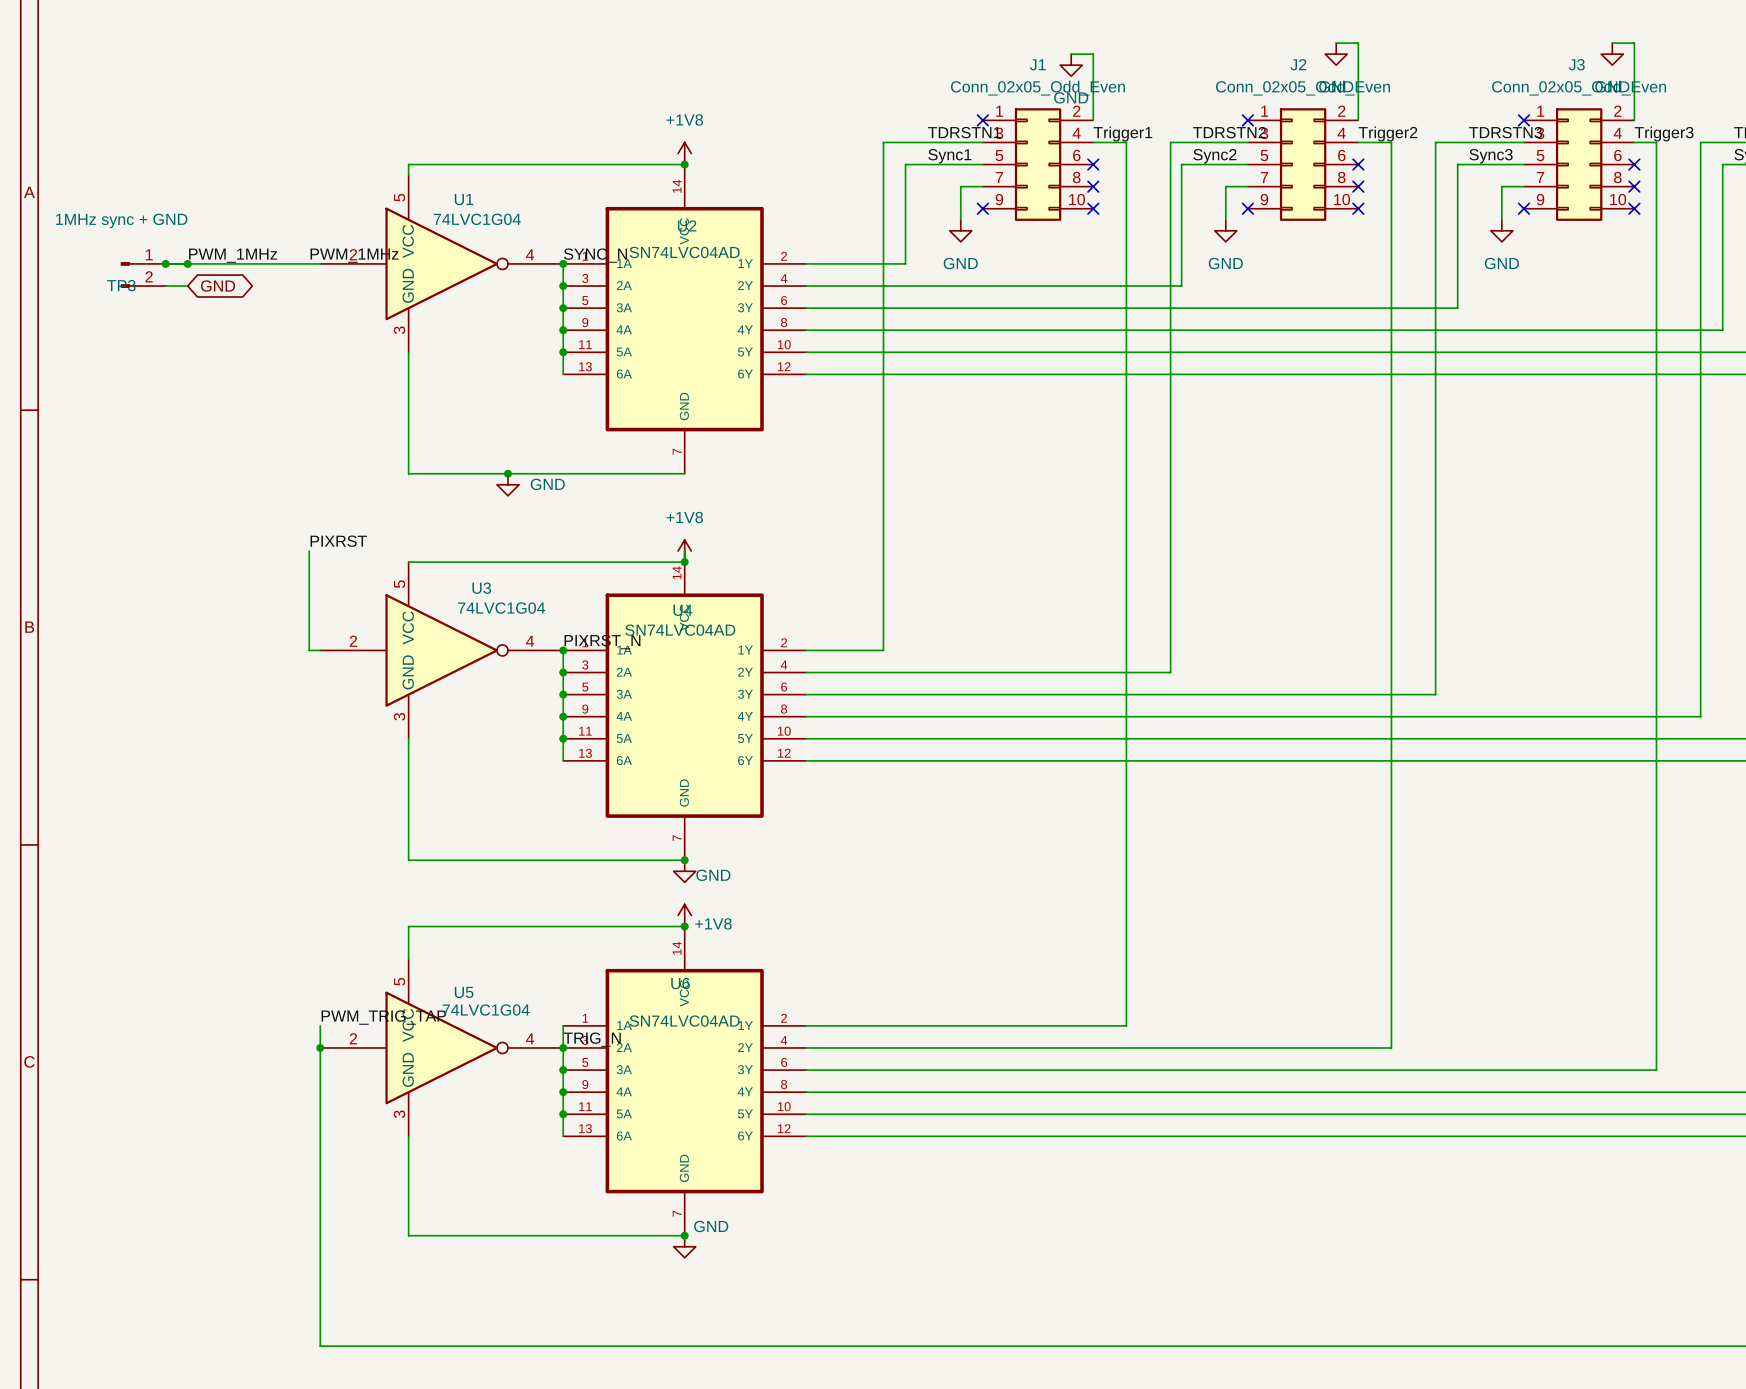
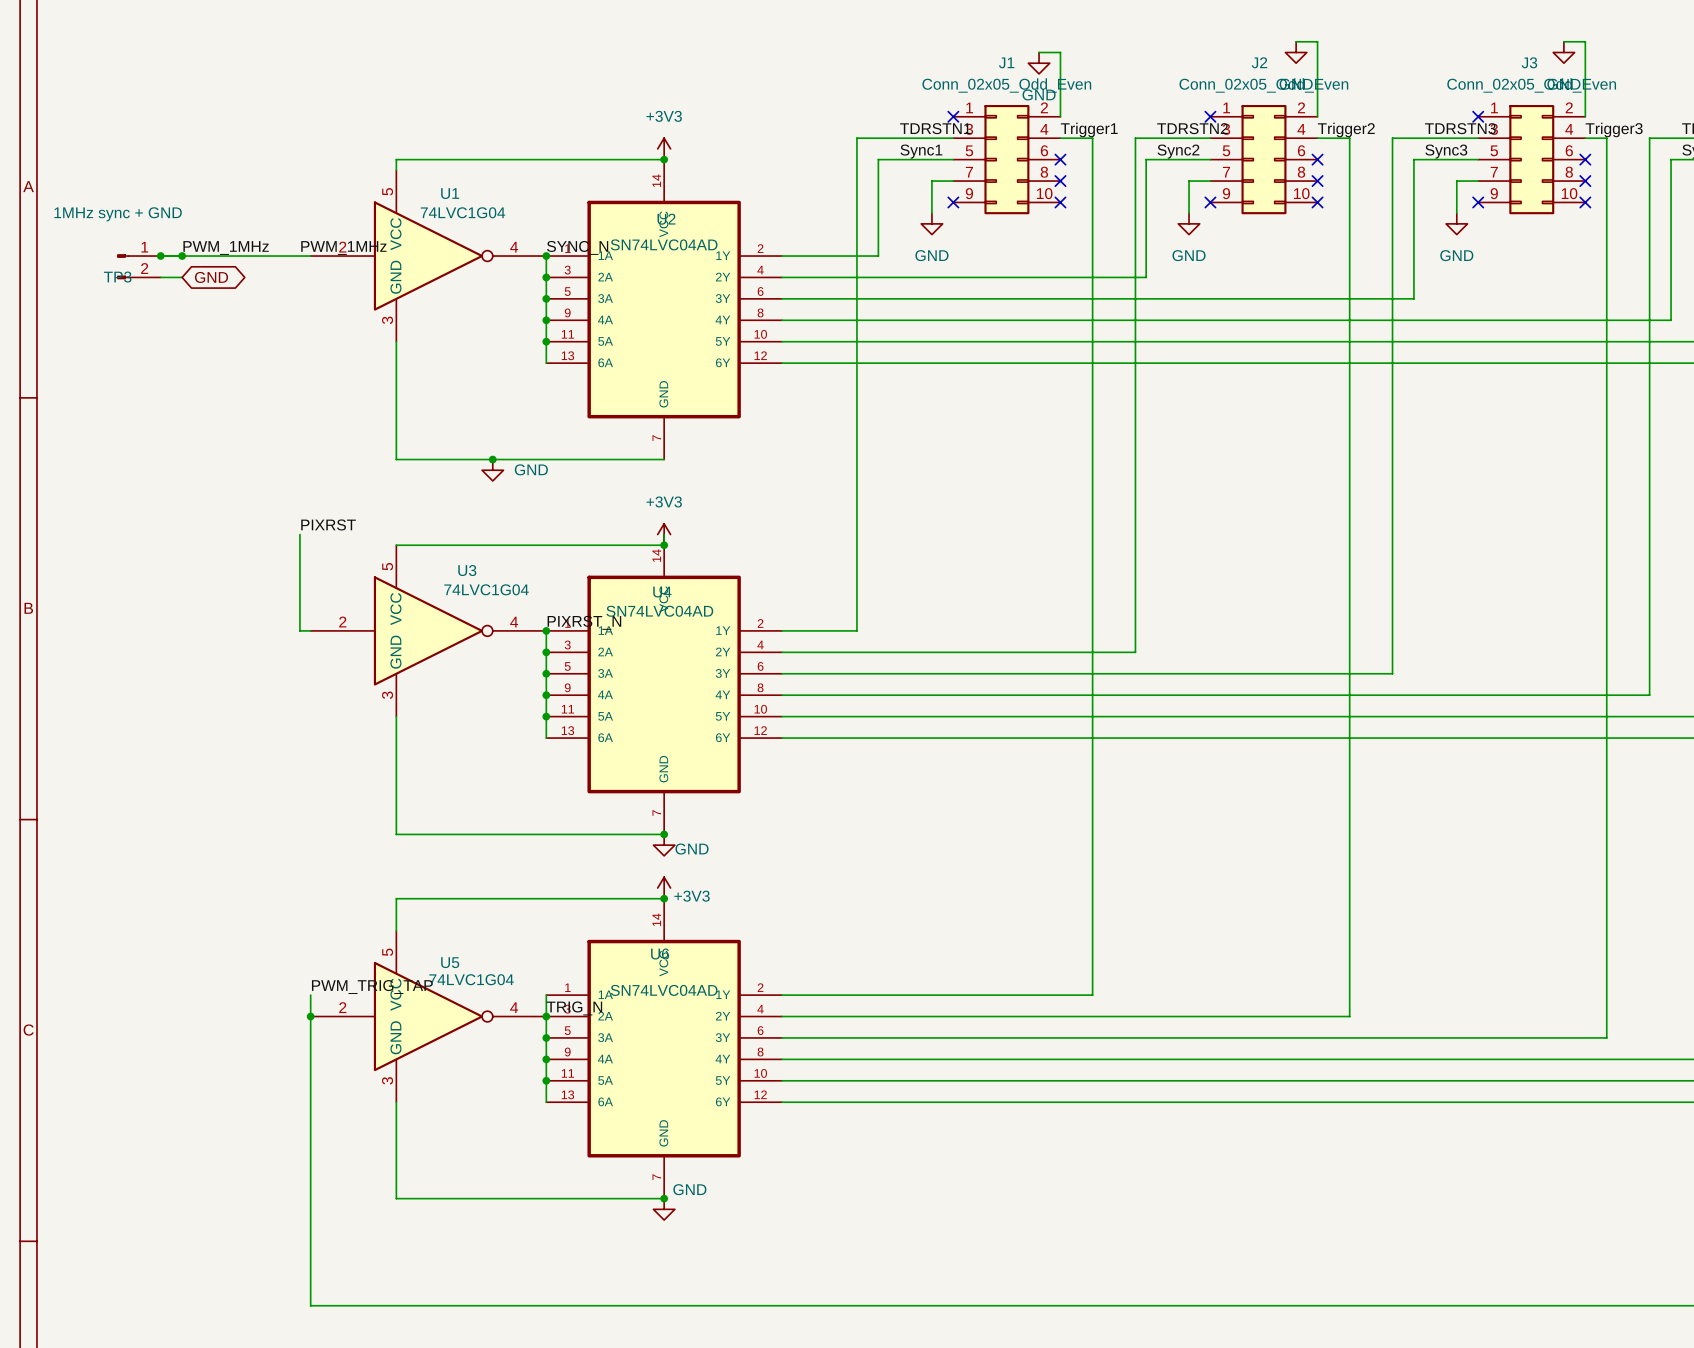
power symbol: +1V8 (684, 153) -> +3V3 (664, 148)
power symbol: +1V8 (684, 551) -> +3V3 (664, 534)
power symbol: +1V8 (684, 915) -> +3V3 (664, 887)

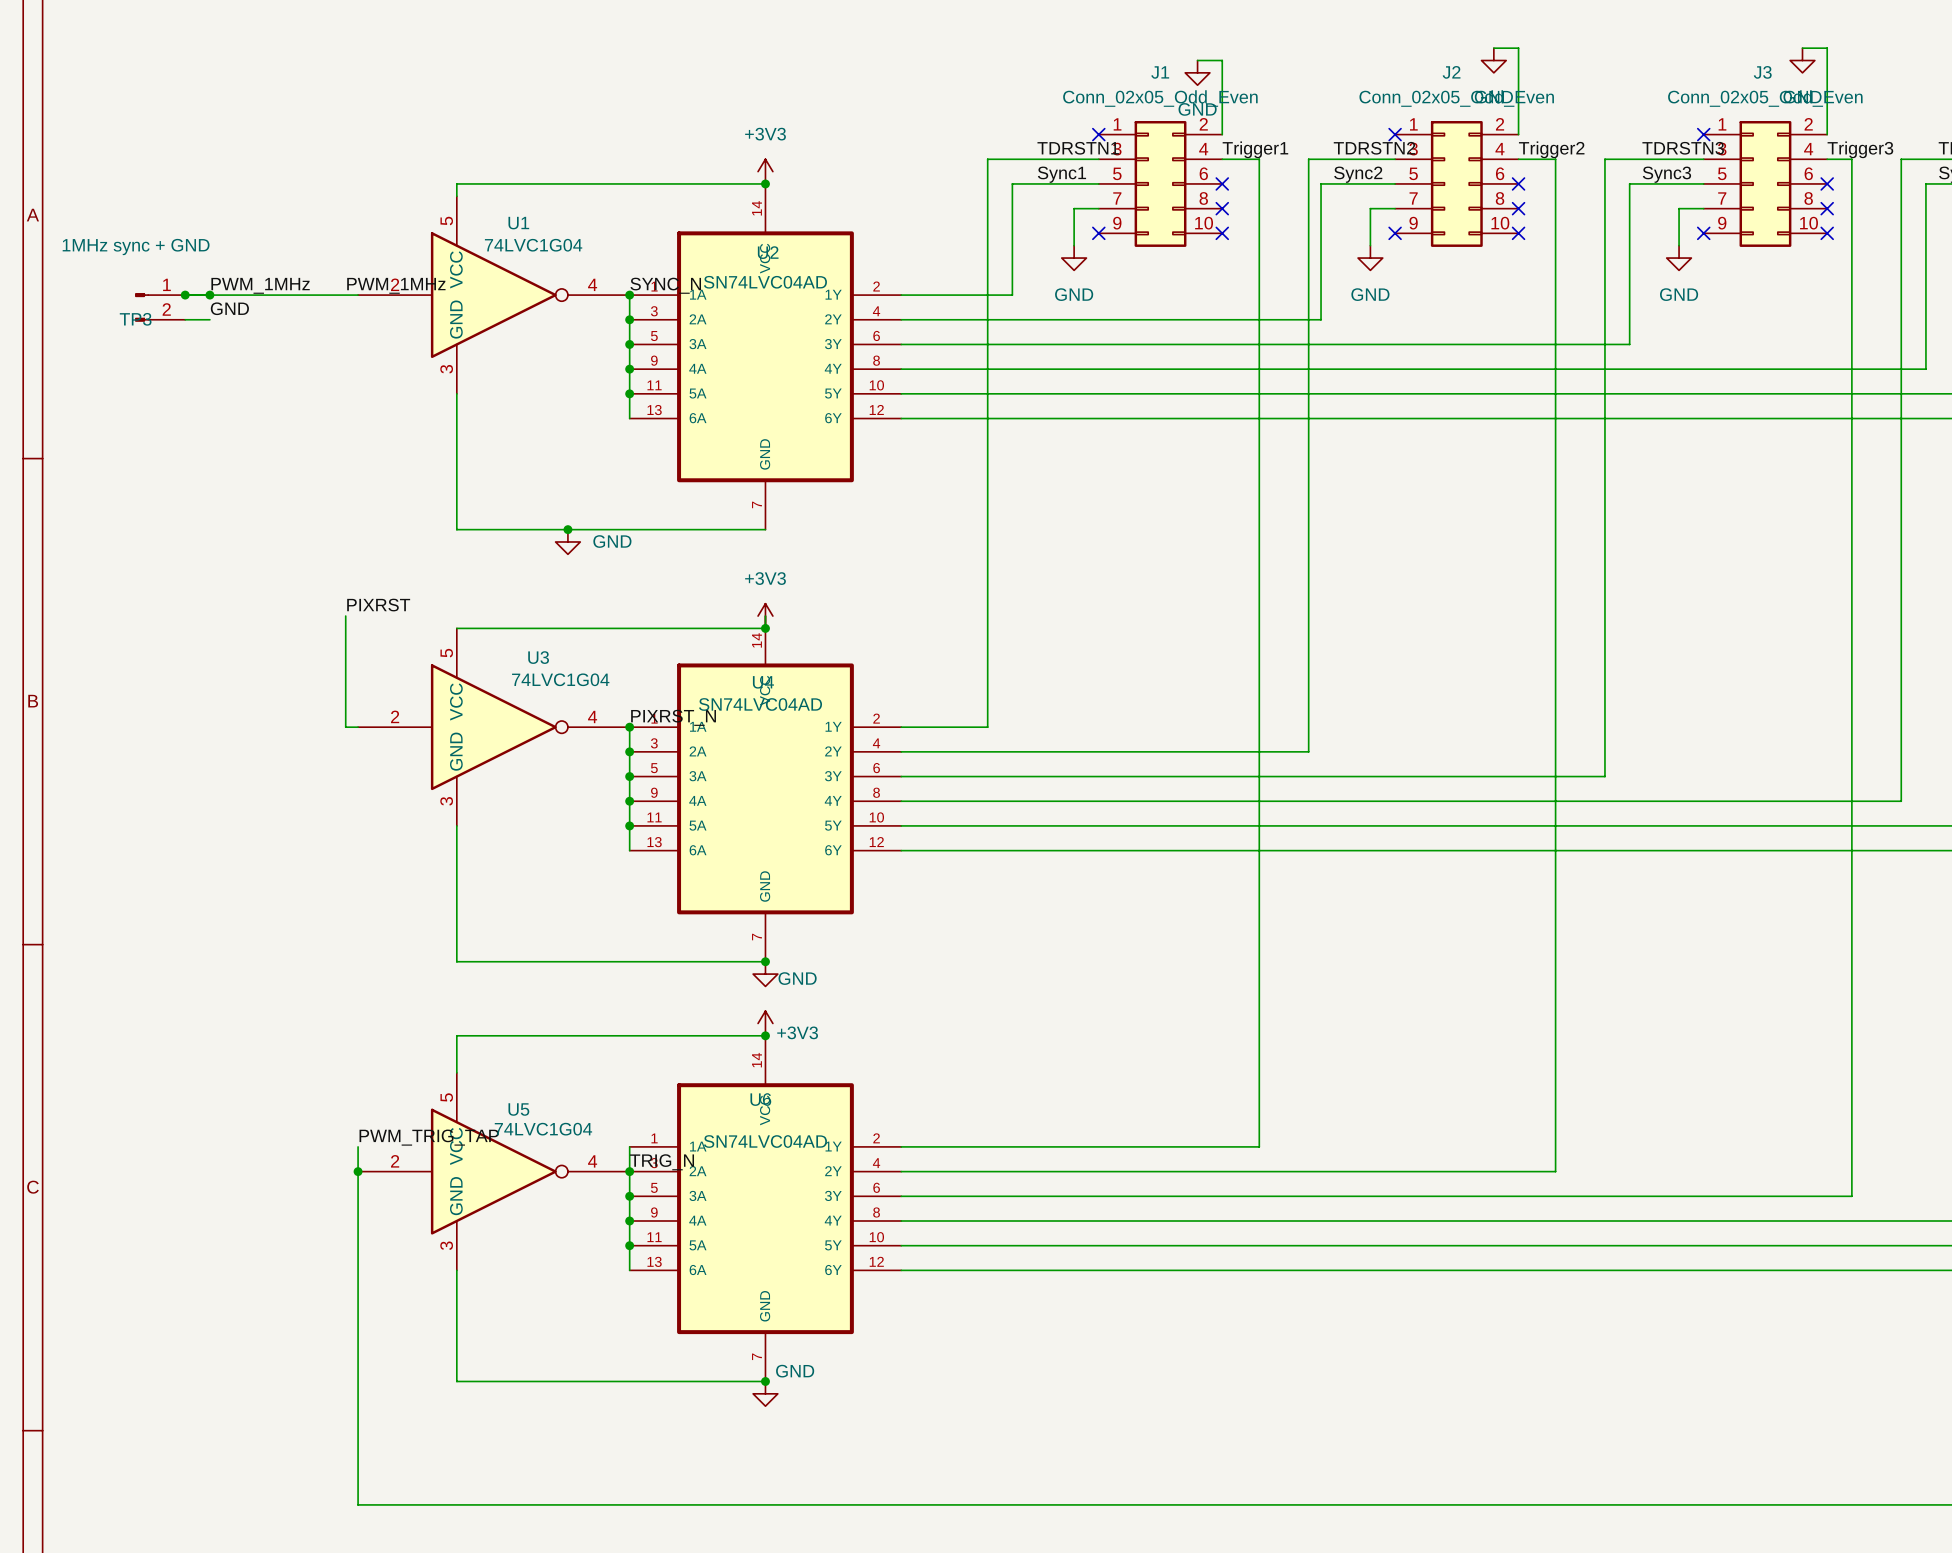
label: none -> GND (229, 308)
global label: GND (211, 277) -> none

